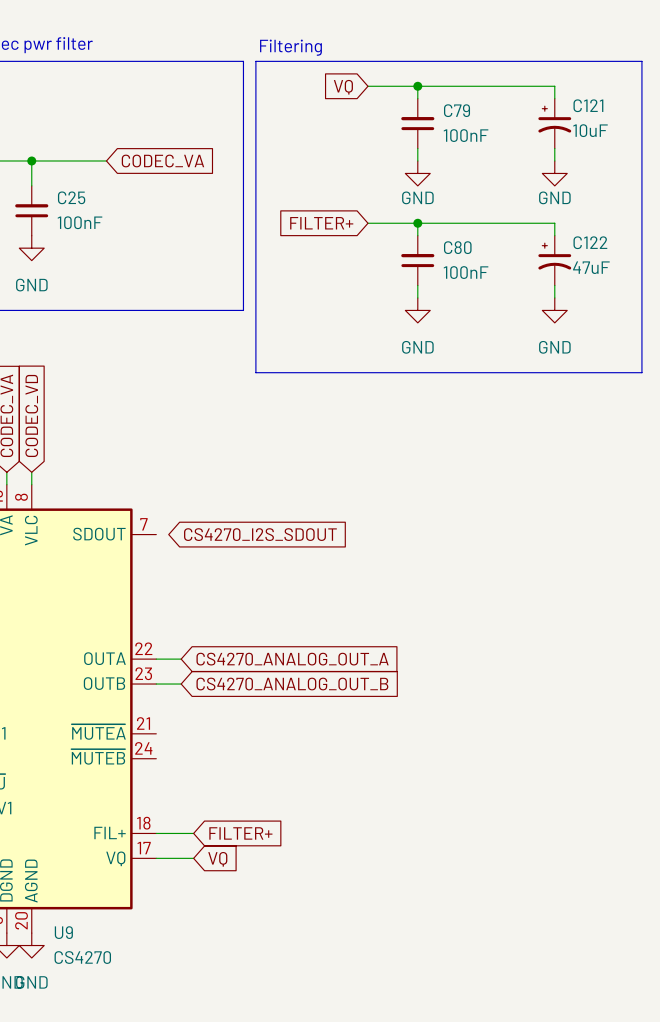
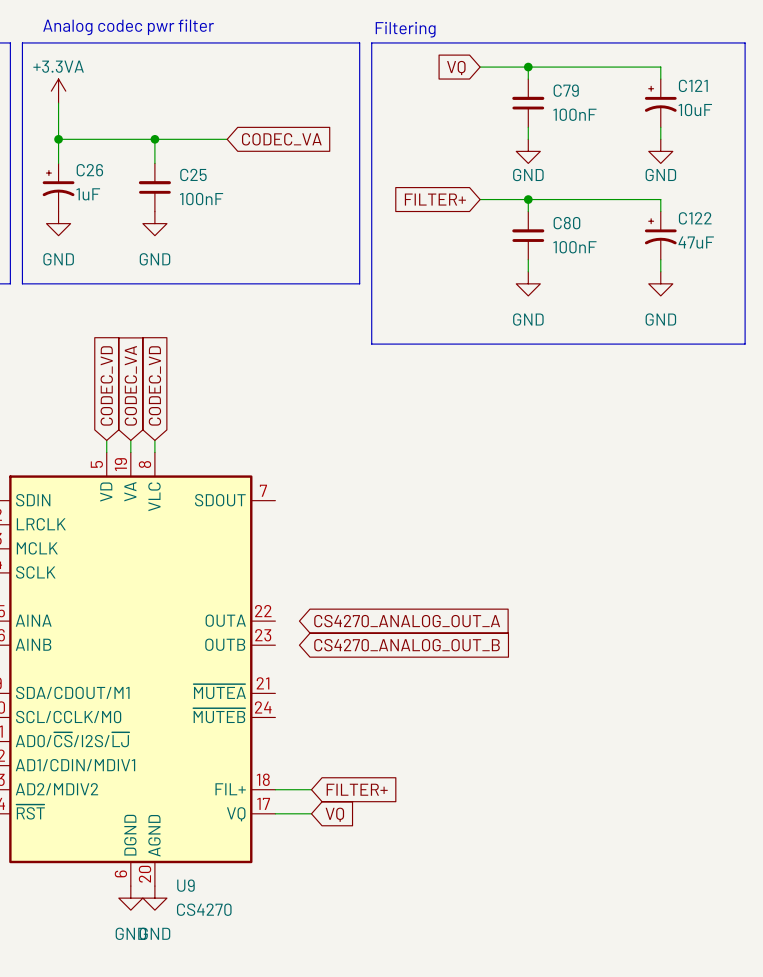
global label: CS4270_I2S_SDOUT (260, 534) -> none
wire: (156, 659) (181, 659) -> none
wire: (156, 684) (181, 684) -> none

